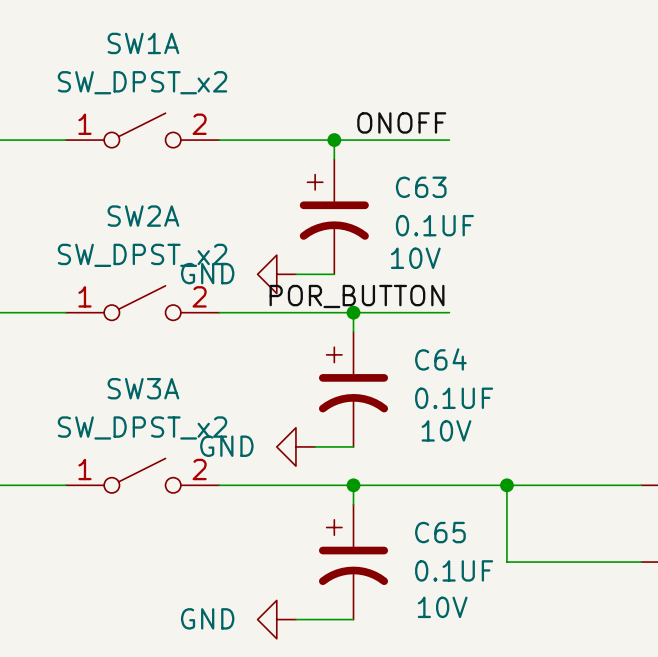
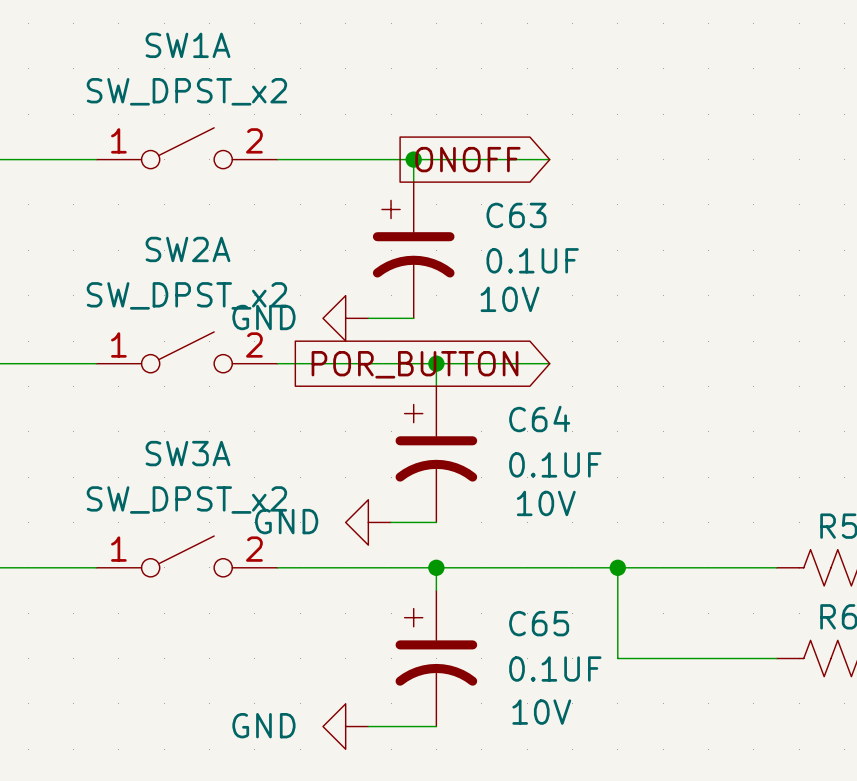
label: ONOFF (401, 122) -> none
global label: none -> ONOFF (467, 159)
label: POR_BUTTON (357, 296) -> none
global label: none -> POR_BUTTON (415, 364)

